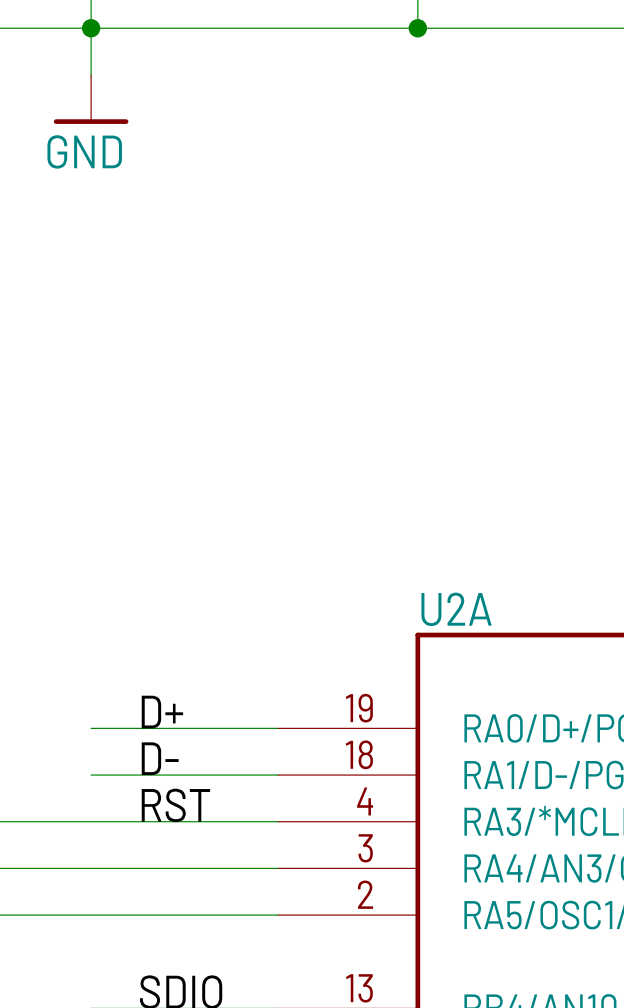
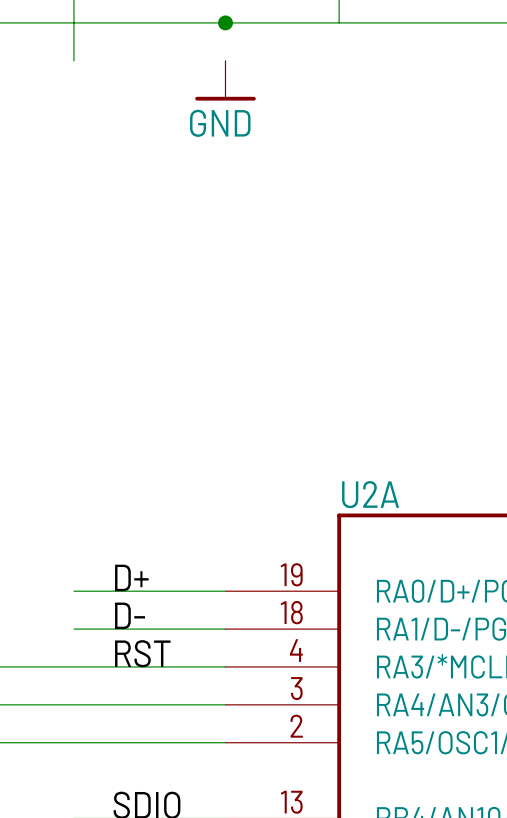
junction: (91, 28) -> none
junction: none -> (225, 22)
junction: (417, 28) -> none
power symbol position: GND (91, 99) -> GND (225, 80)

